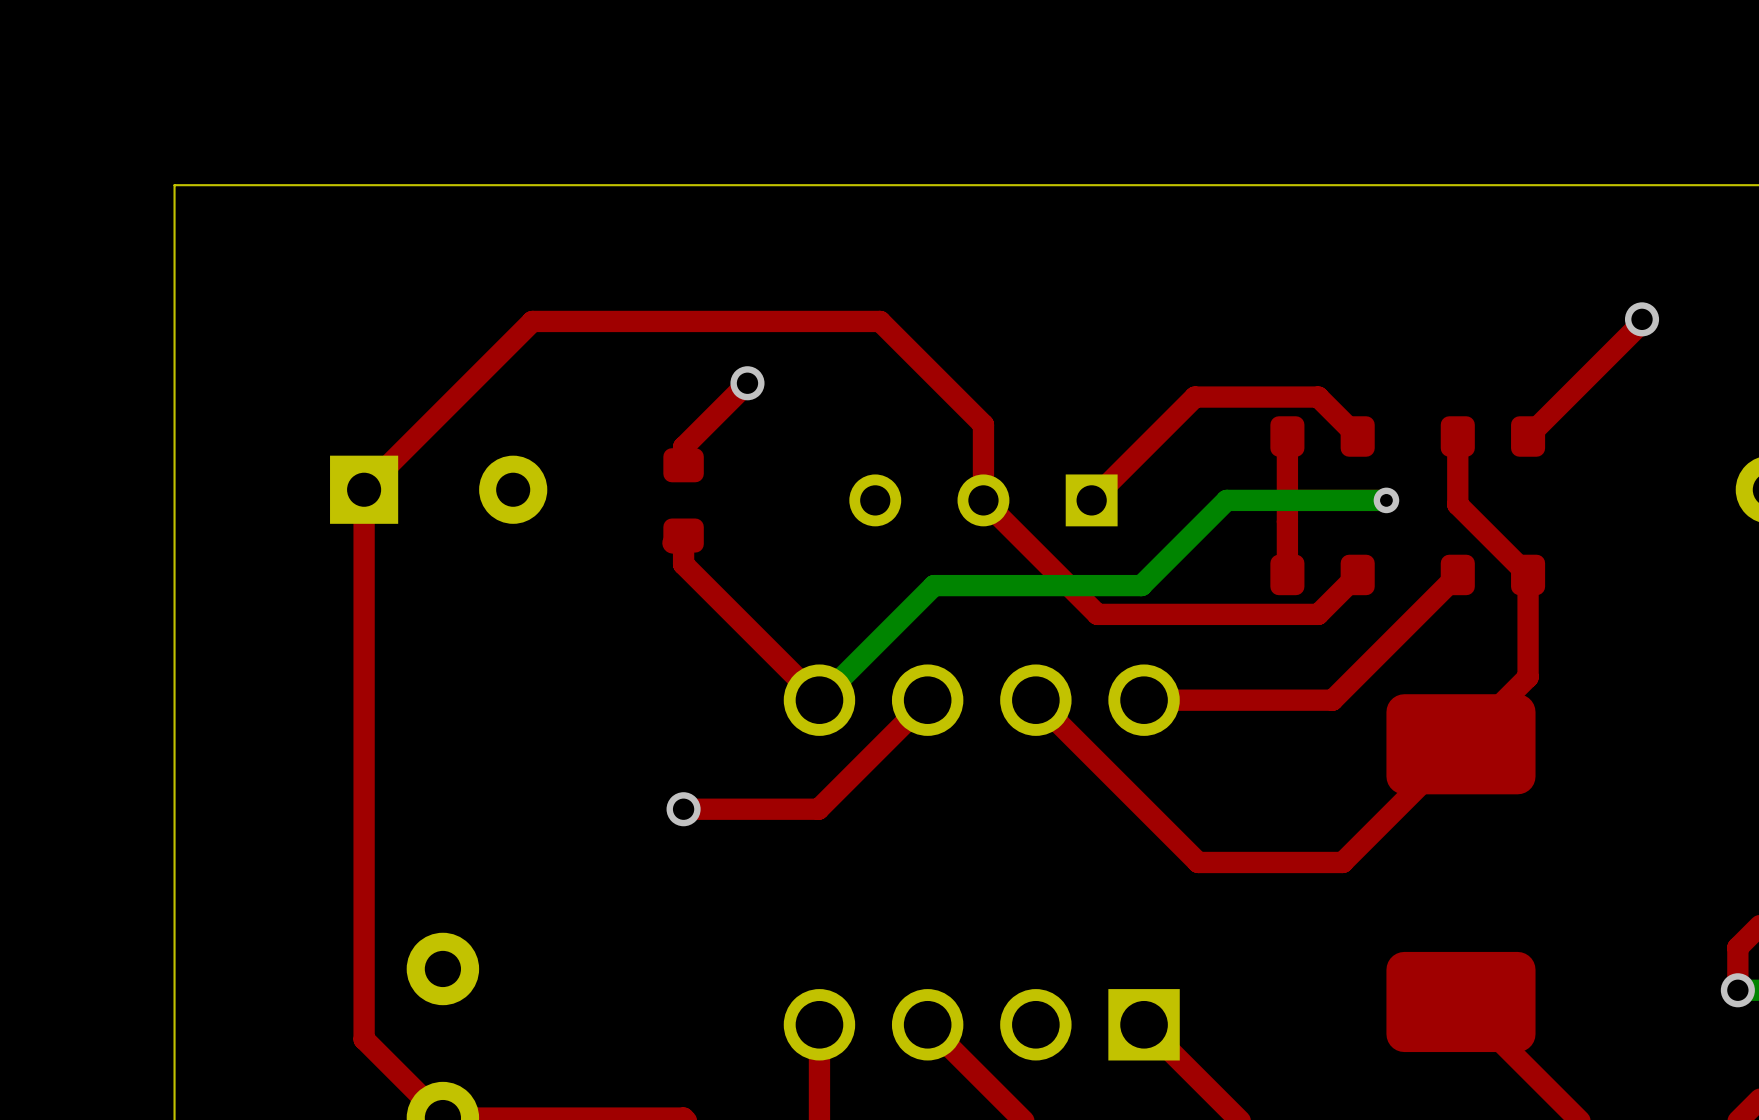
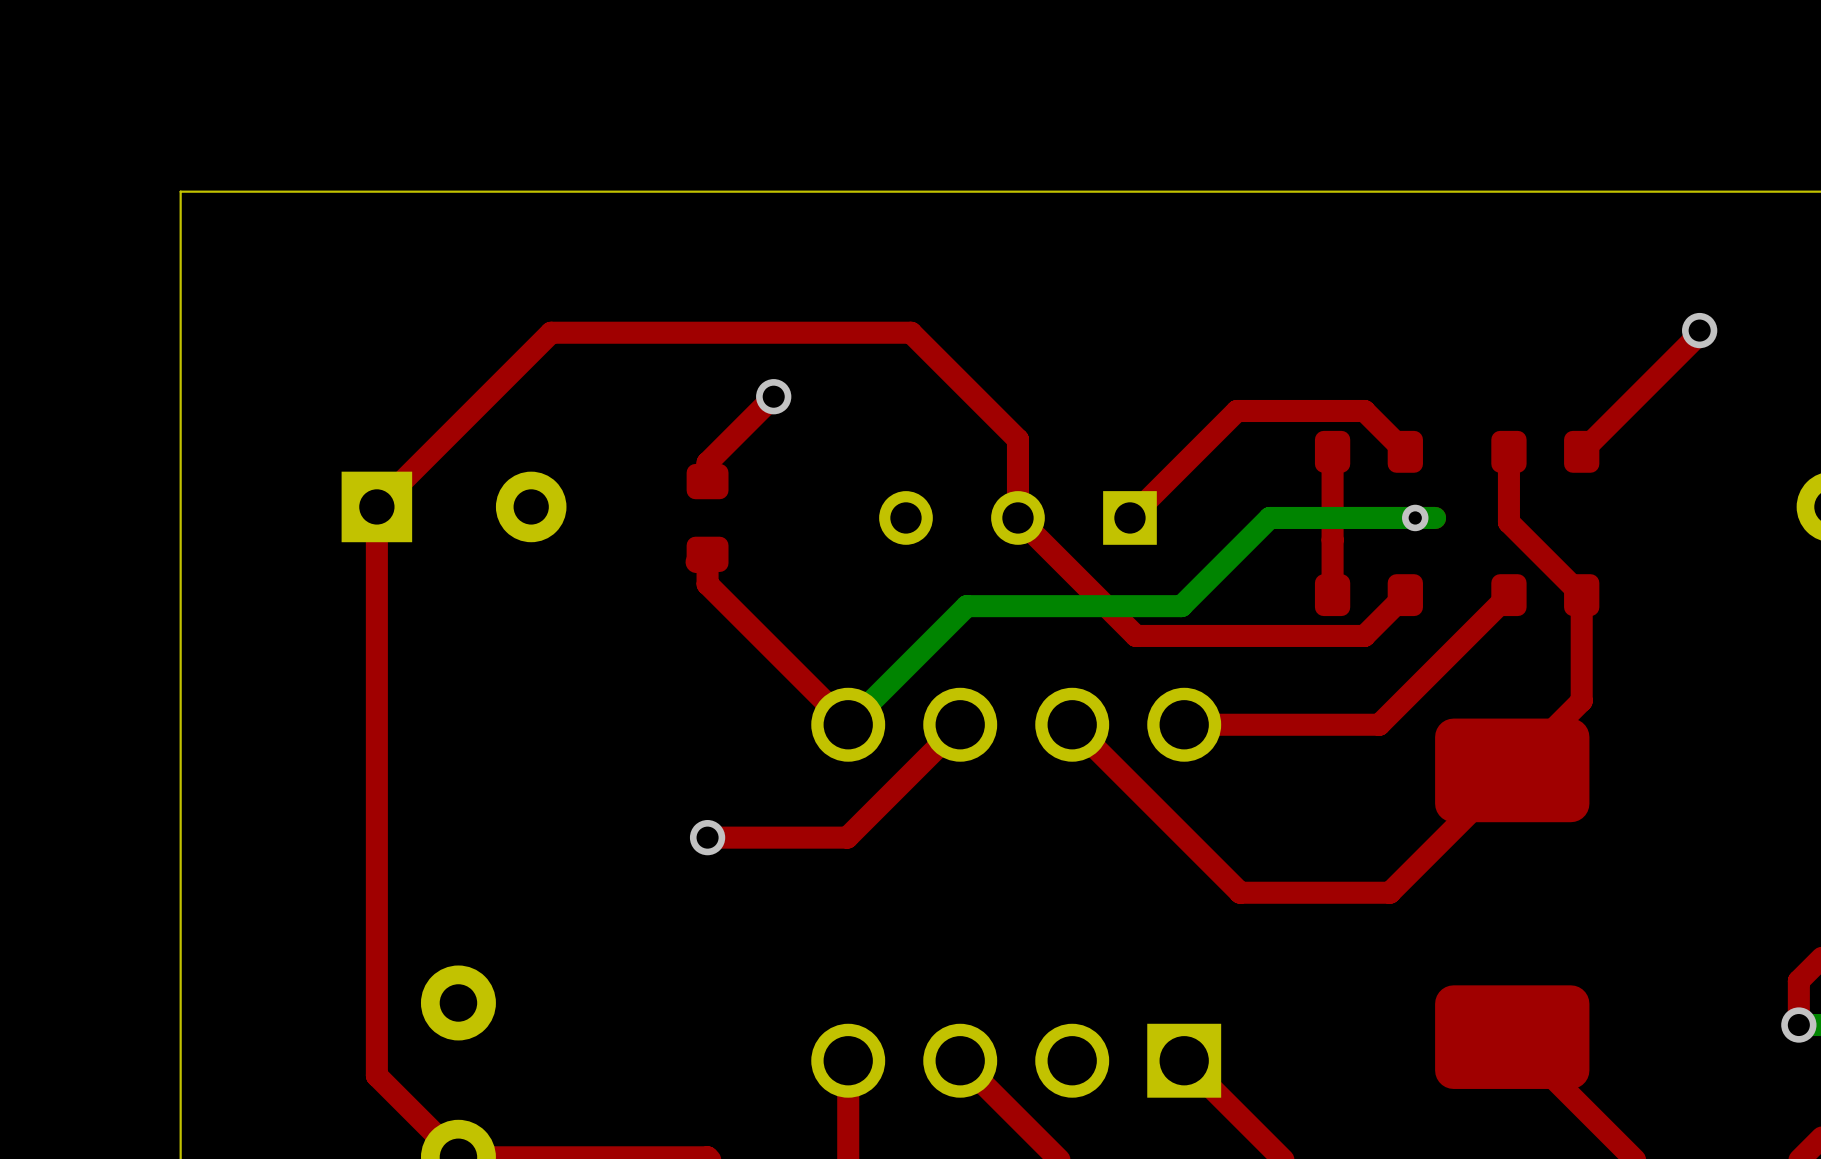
via position: (1386, 500) -> (1415, 517)

